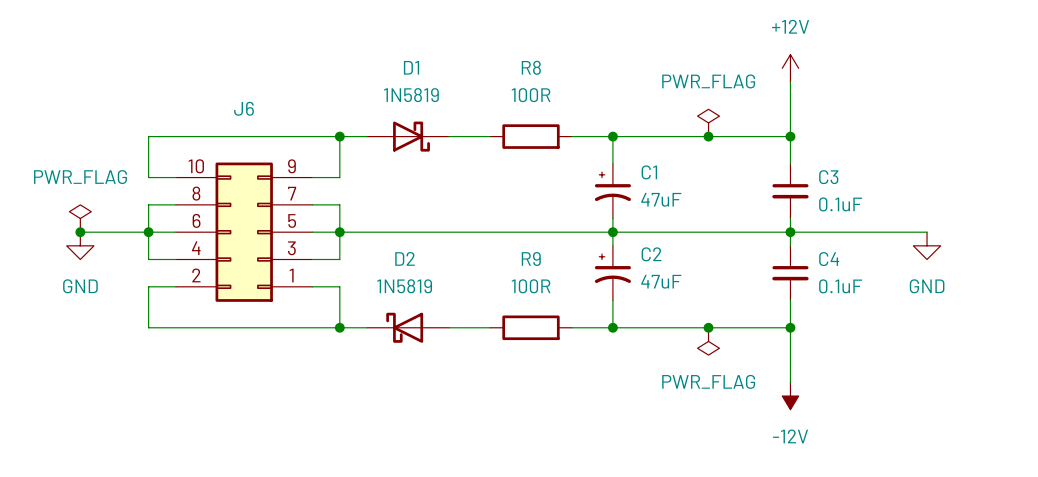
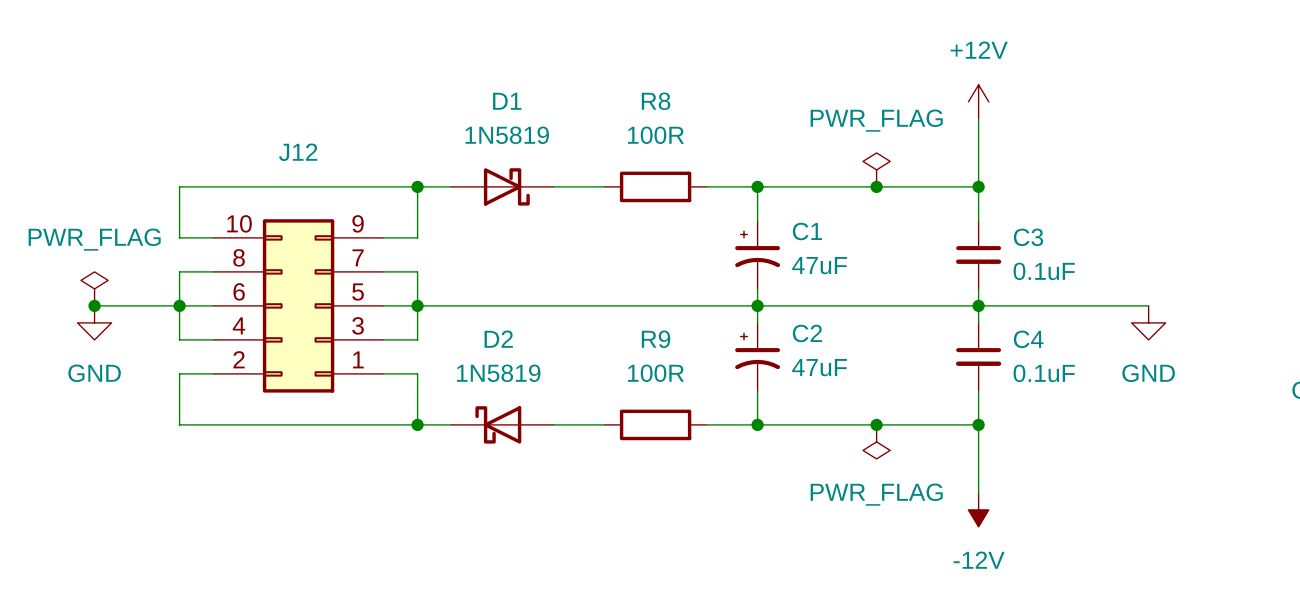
J6 name: J6 (244, 108) -> J12 (298, 152)

